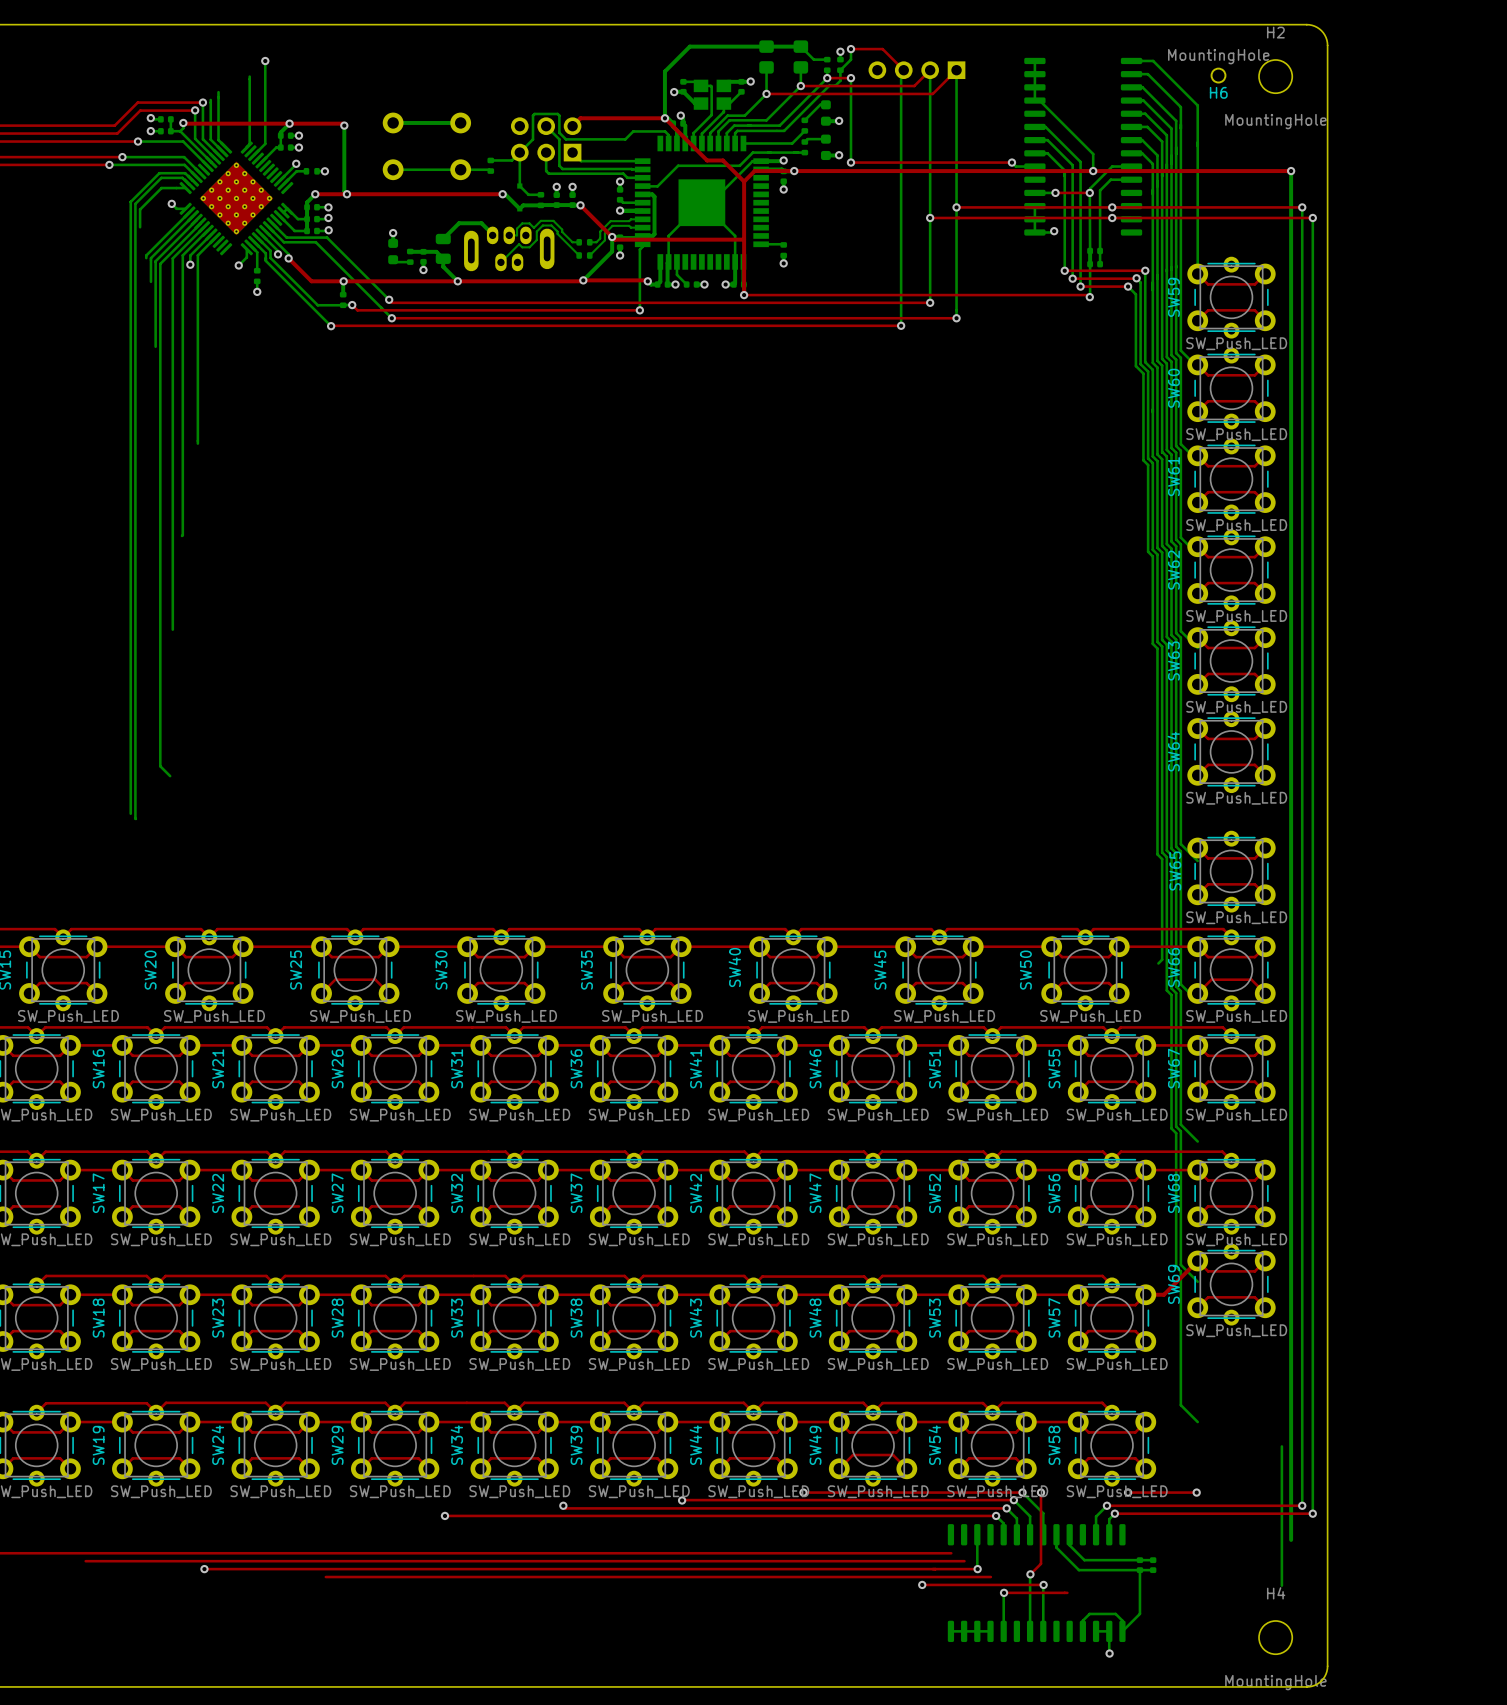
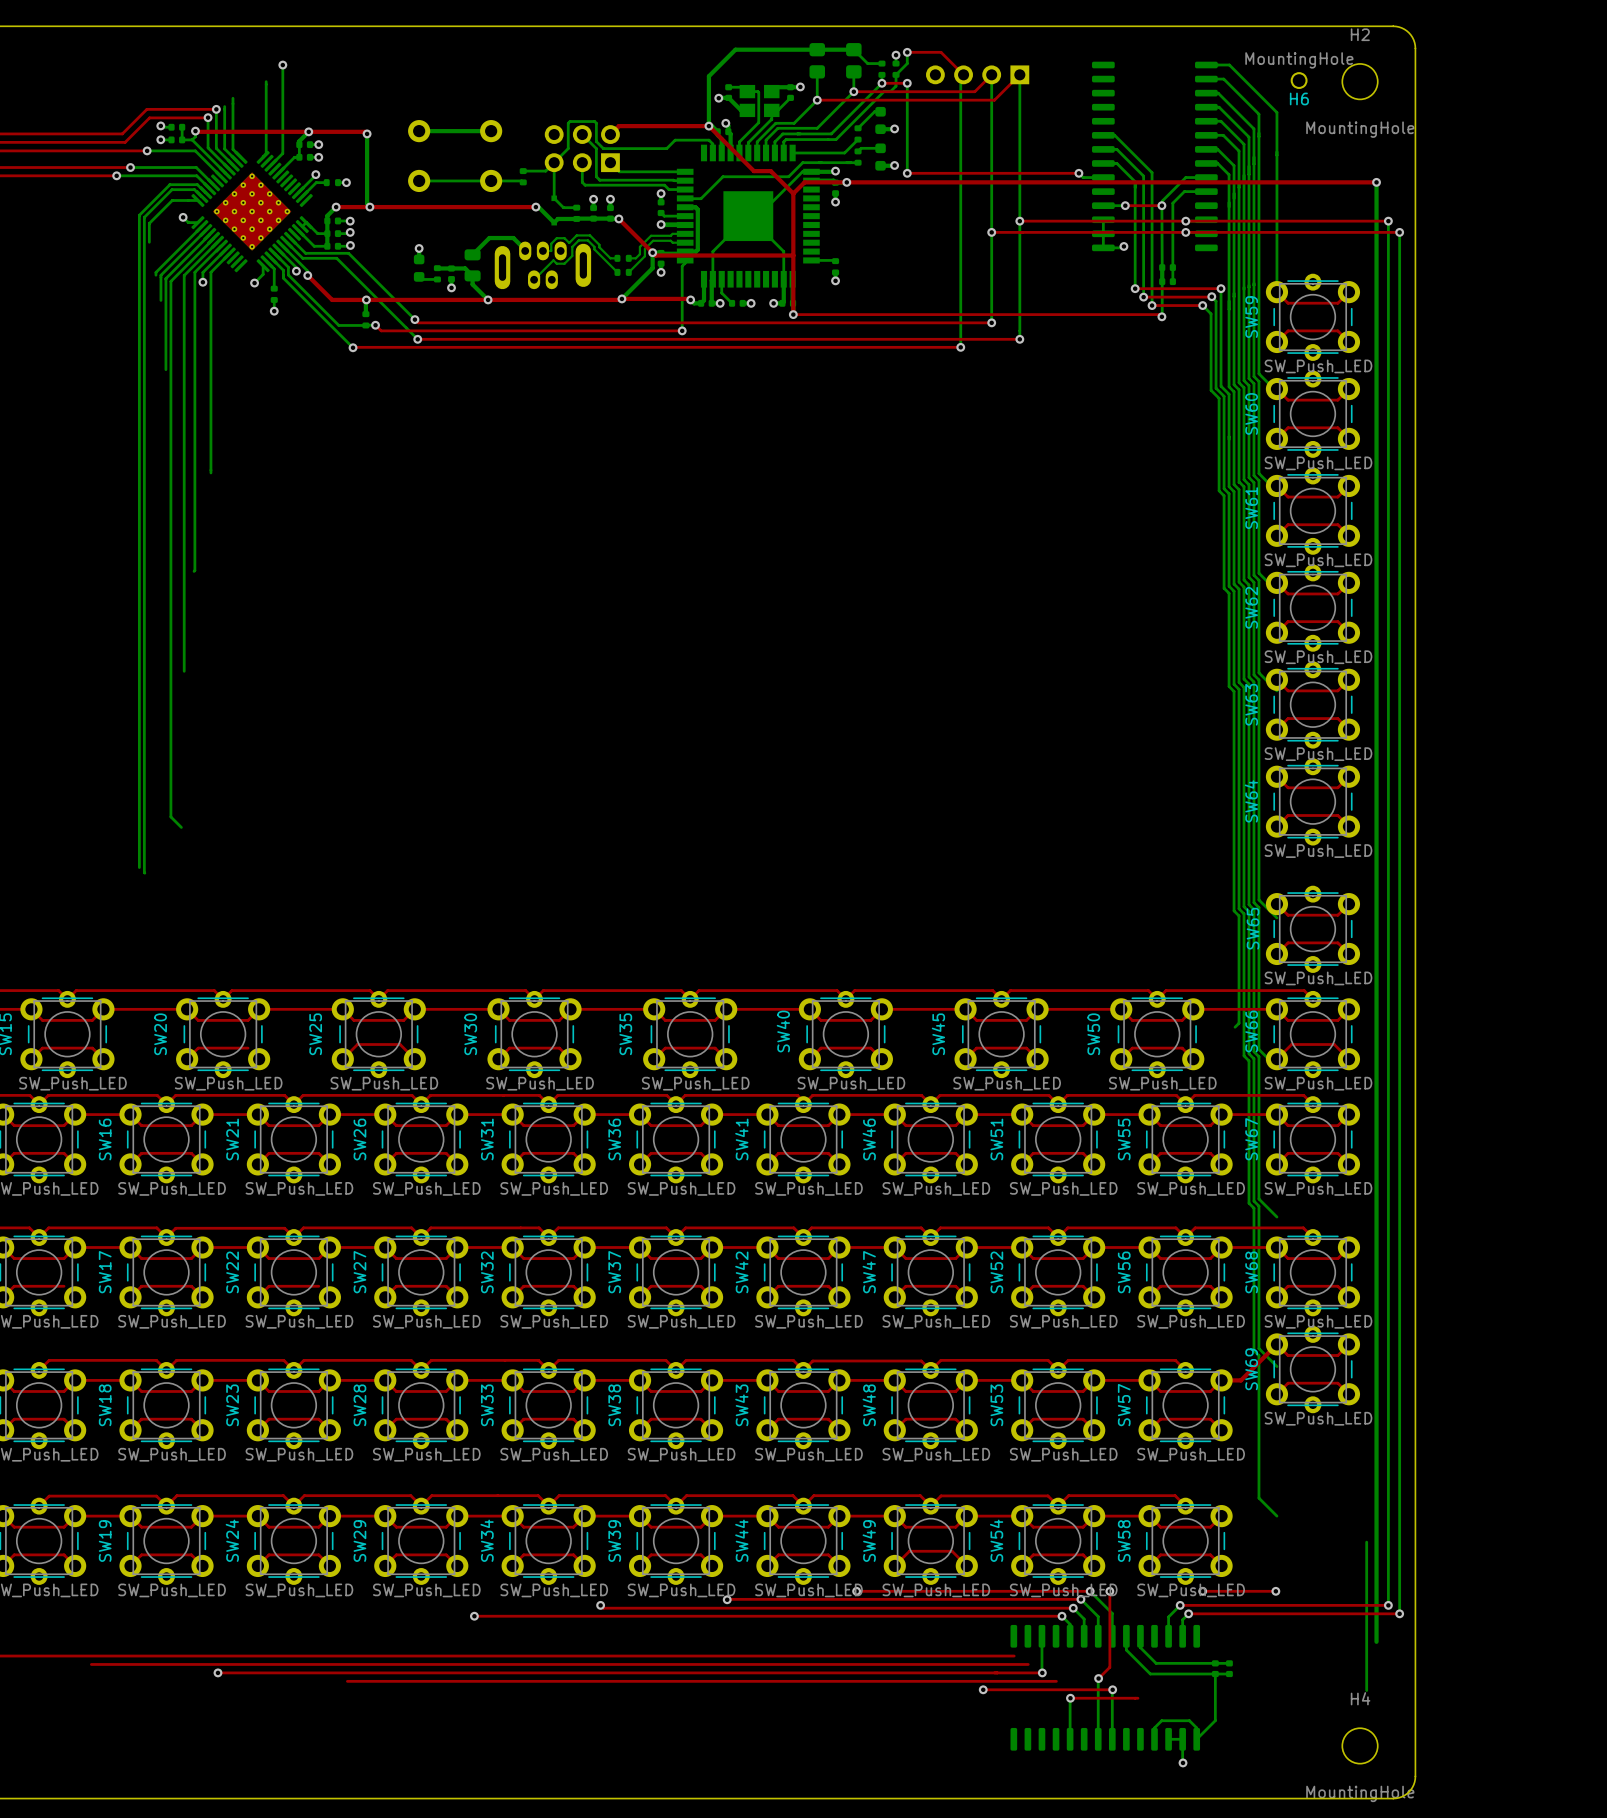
bottom track: (1034, 60) (1034, 100) (1039, 100) (1093, 154) (1093, 171) -> none
via: (1093, 171) -> none
bottom track: (950, 1631) (990, 1631) -> none

